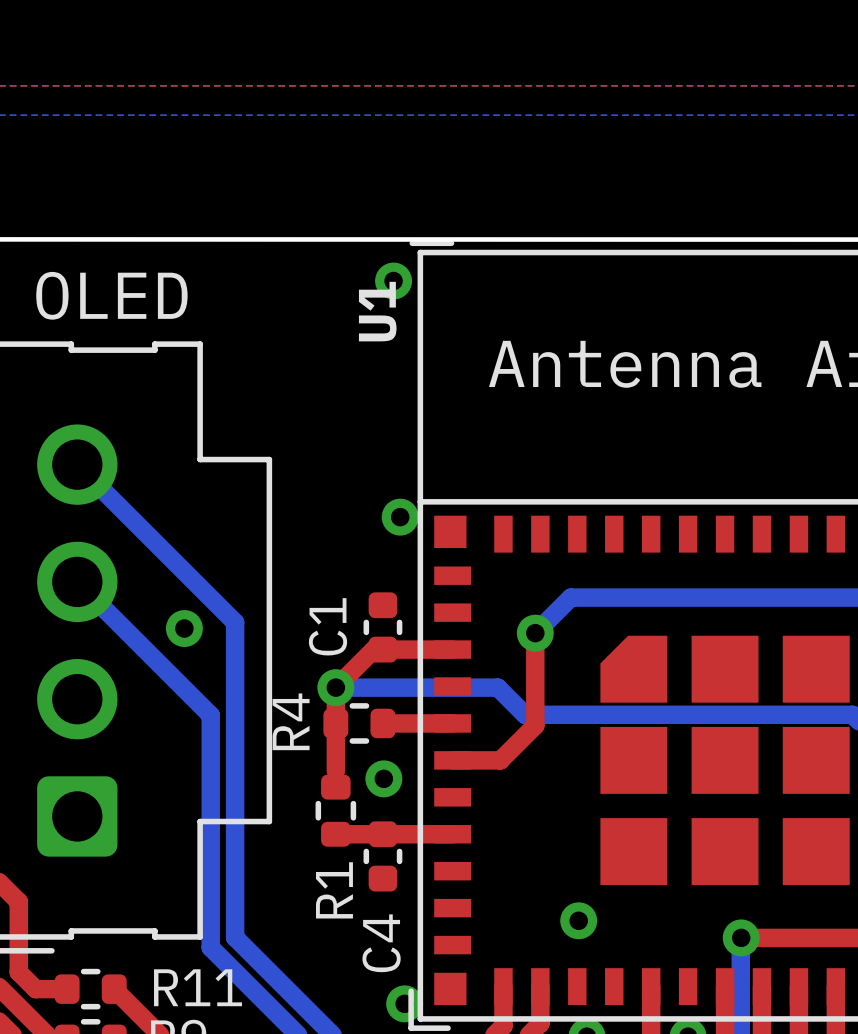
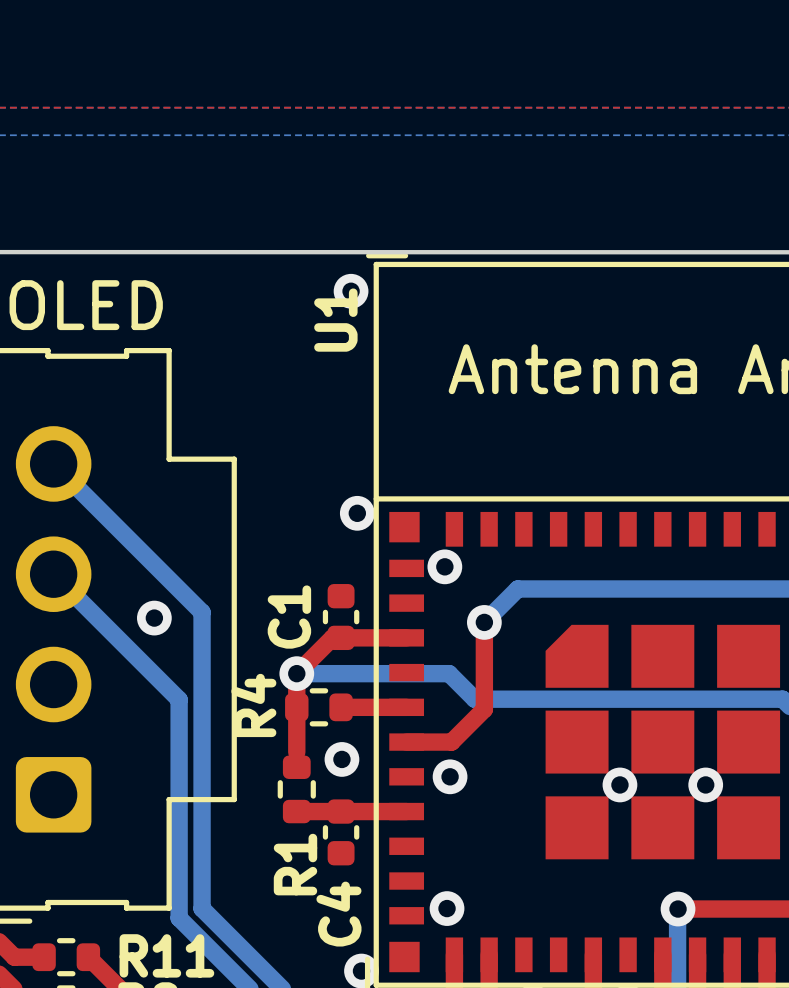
via: none -> (444, 566)
via: none -> (450, 776)
via: none -> (619, 784)
via: none -> (705, 784)
via: (578, 920) -> none
via: none -> (447, 908)

